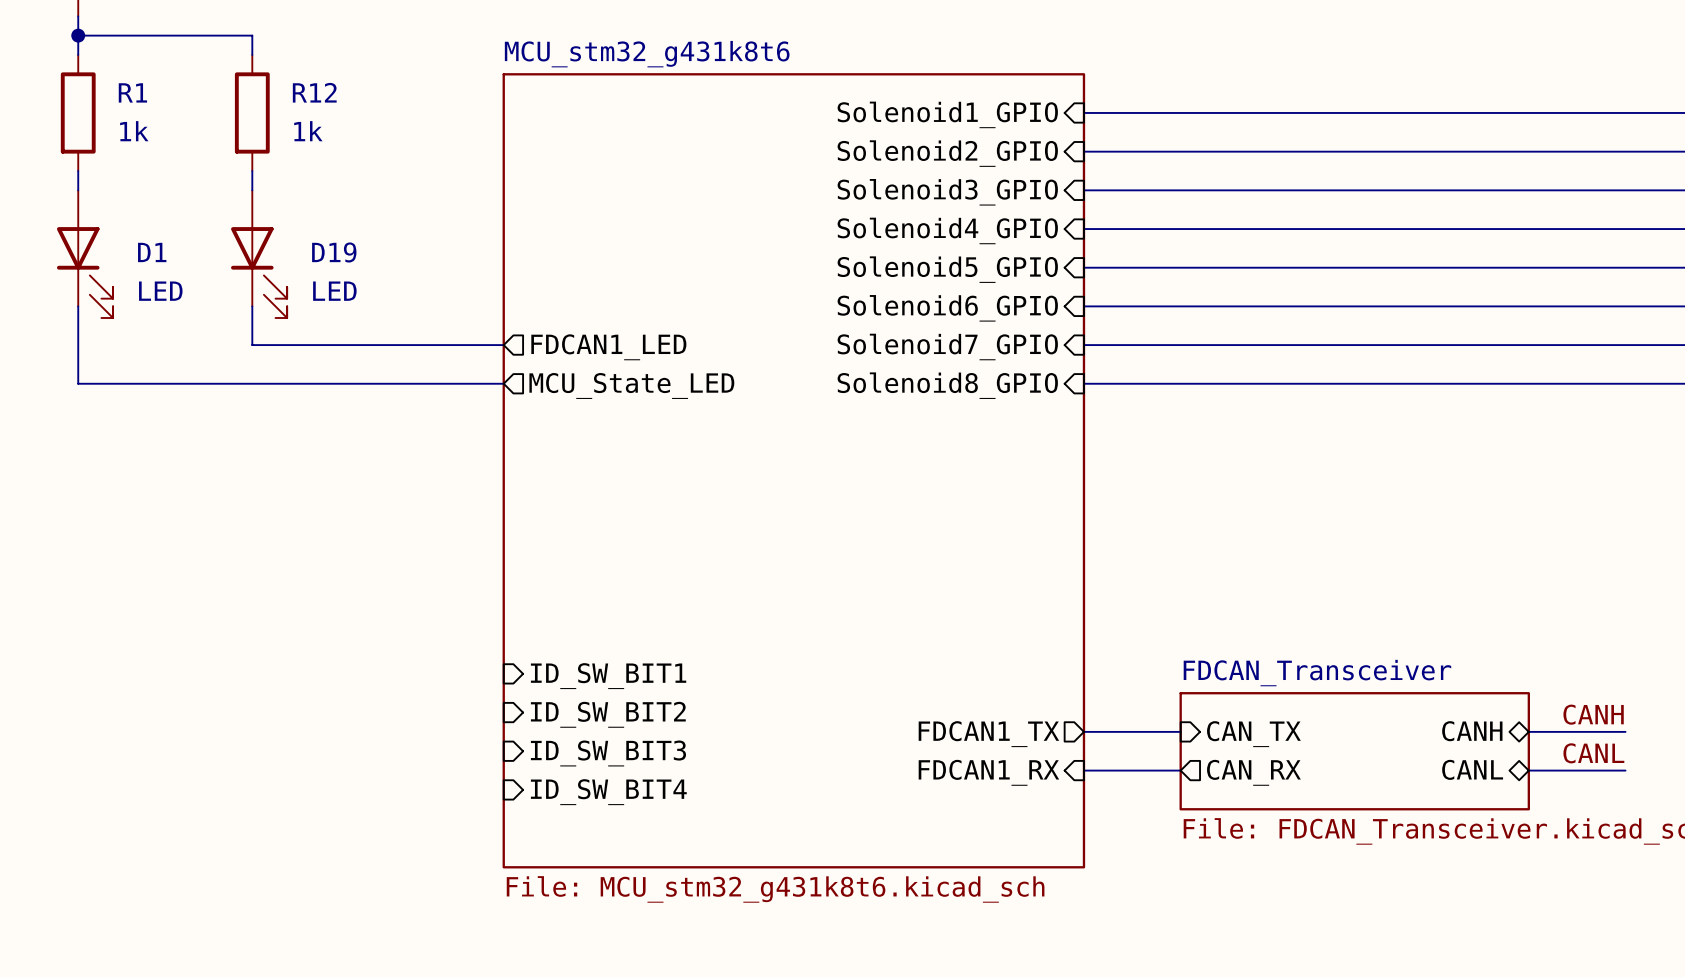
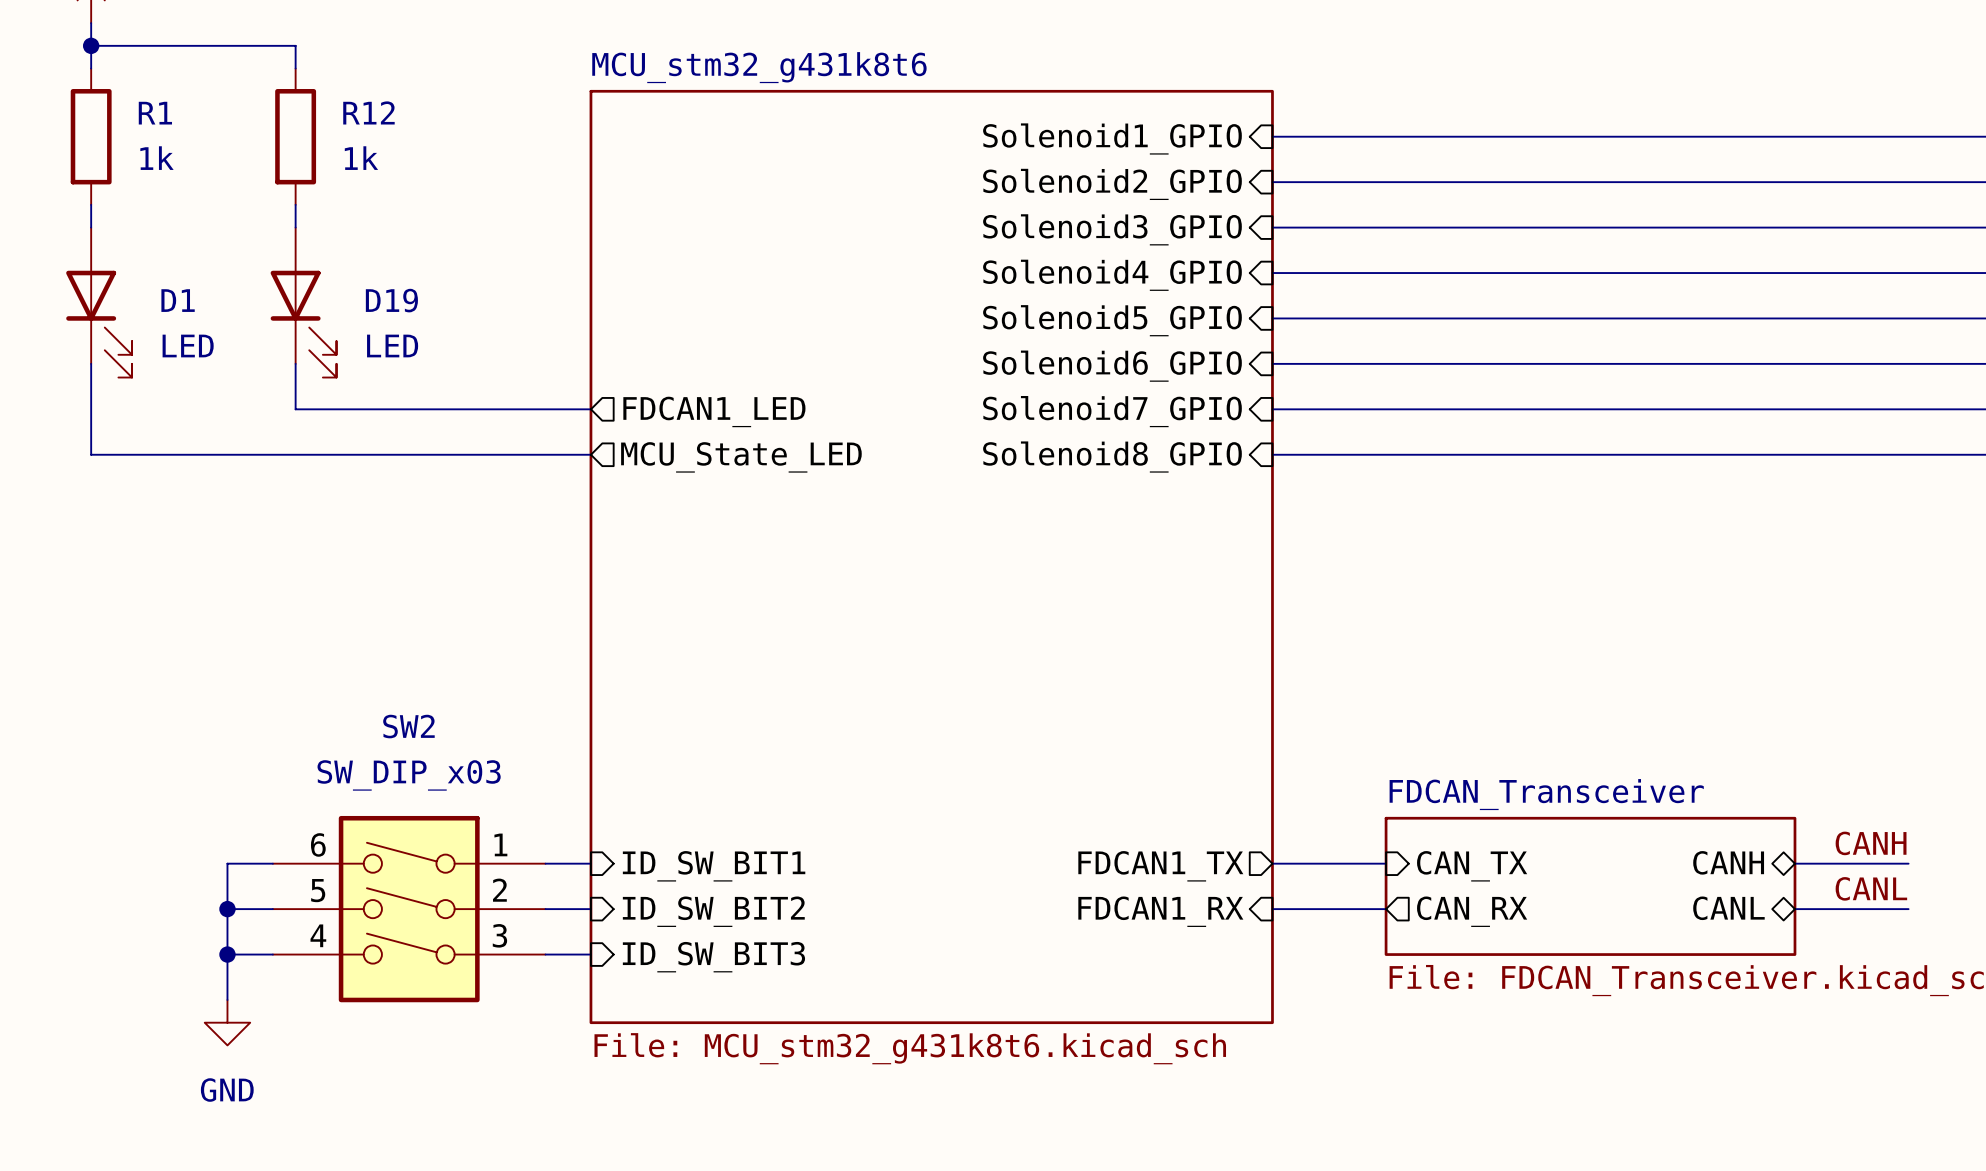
sheet pin position: ID_SW_BIT1 (608, 676) -> ID_SW_BIT1 (714, 866)
sheet pin position: ID_SW_BIT2 (608, 714) -> ID_SW_BIT2 (713, 911)
wire: none -> (272, 863) (227, 863) (227, 999)
wire: none -> (545, 863) (590, 863)
sheet pin position: ID_SW_BIT3 (608, 753) -> ID_SW_BIT3 (713, 957)
wire: none -> (227, 909) (272, 909)
junction: none -> (227, 909)
SW2: none -> SW_DIP_x03 (409, 909)
wire: none -> (545, 909) (590, 909)
sheet pin: ID_SW_BIT4 (608, 792) -> none
wire: none -> (227, 954) (272, 954)
junction: none -> (227, 954)
wire: none -> (545, 954) (590, 954)
power symbol: none -> GND (227, 1022)

